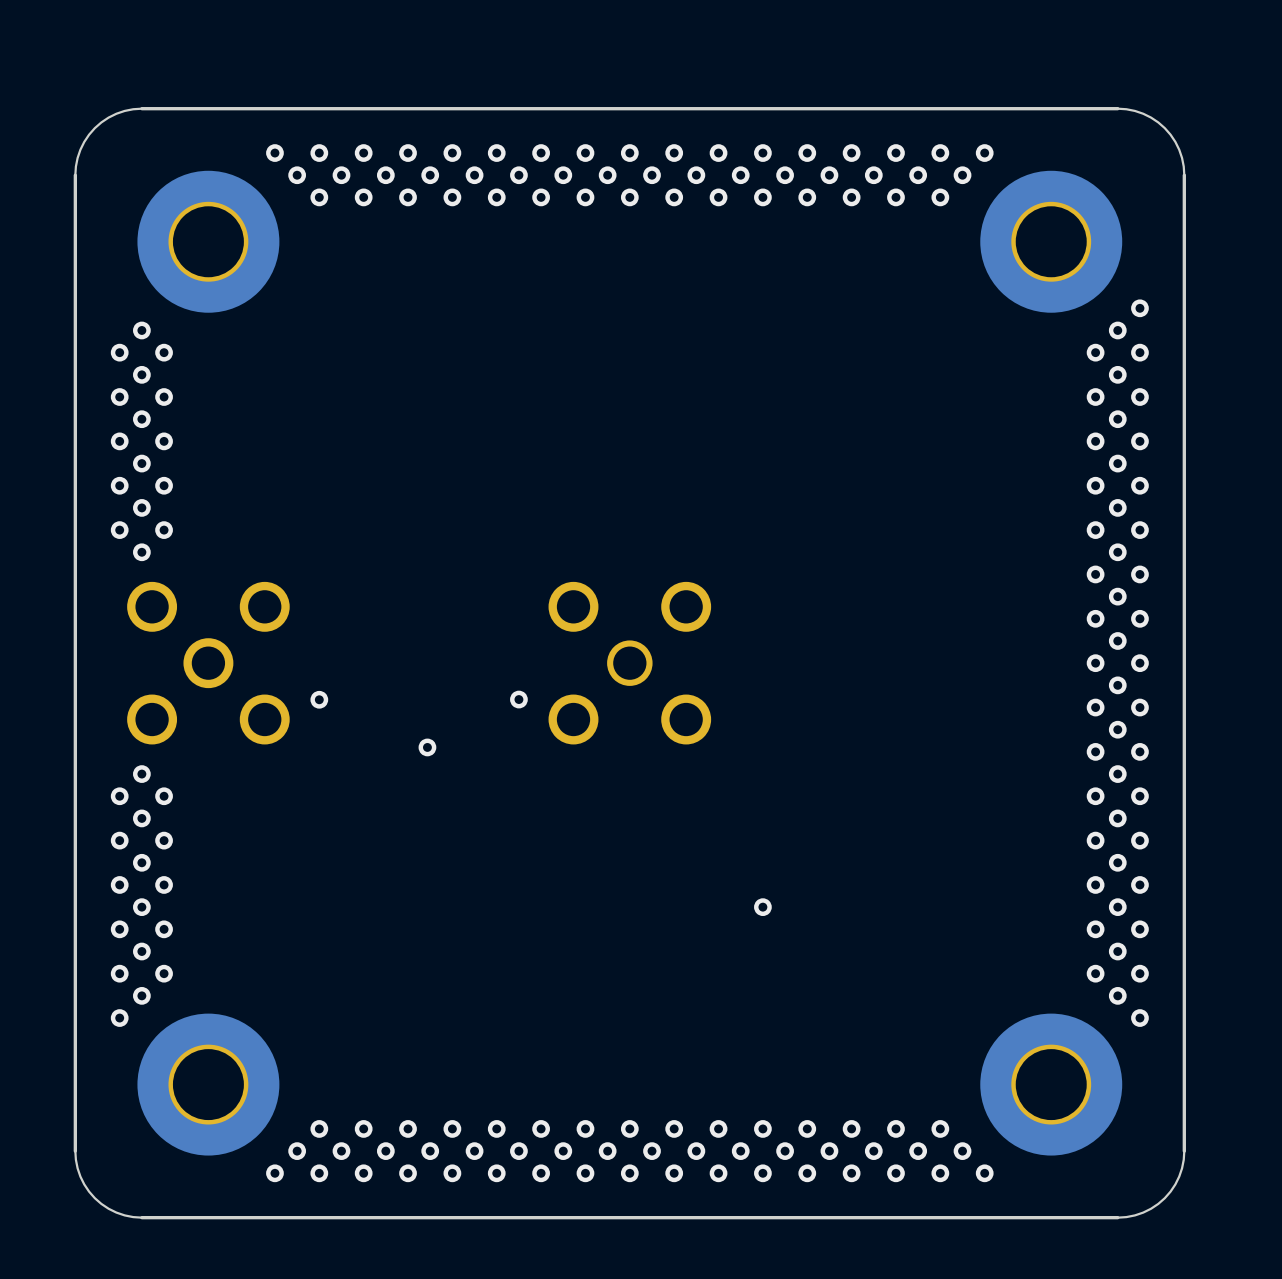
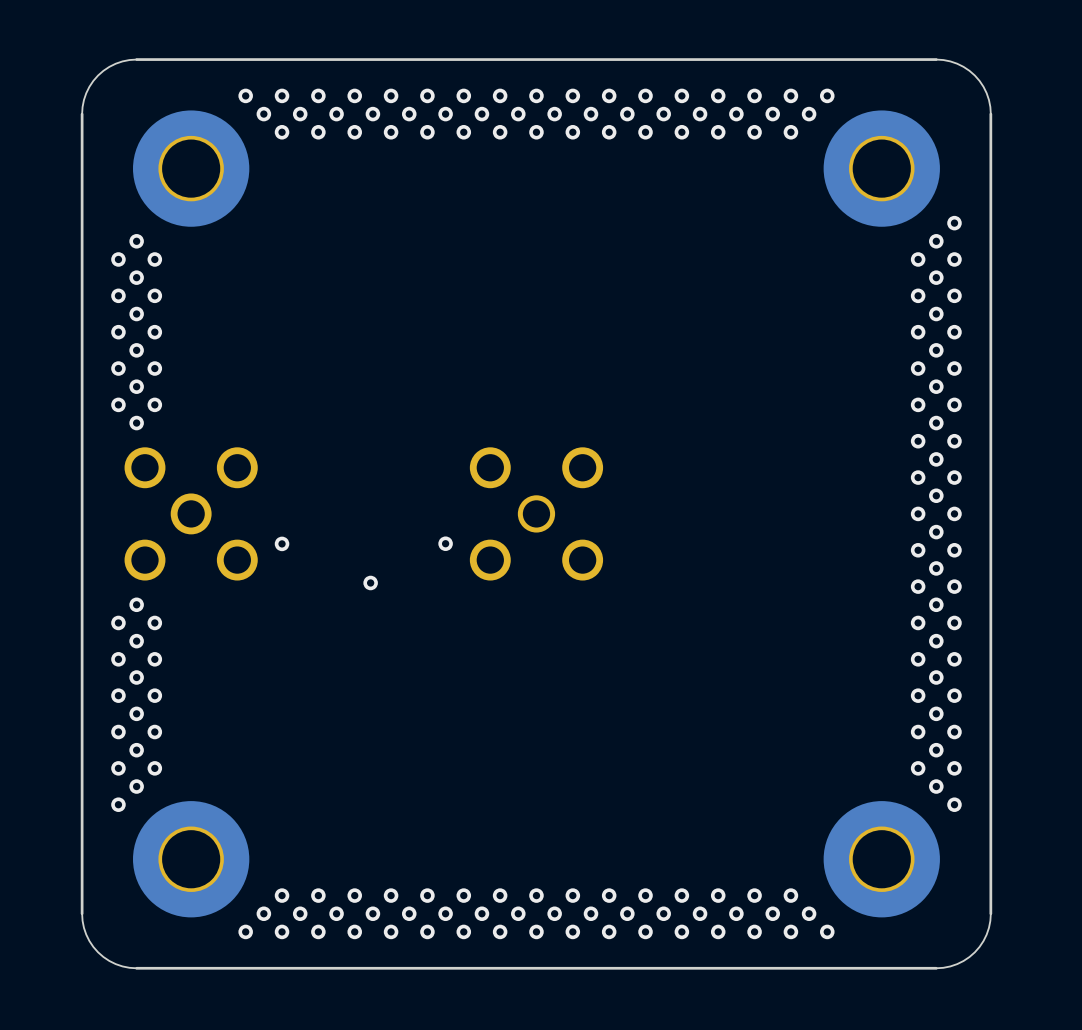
via: (762, 907) -> none

